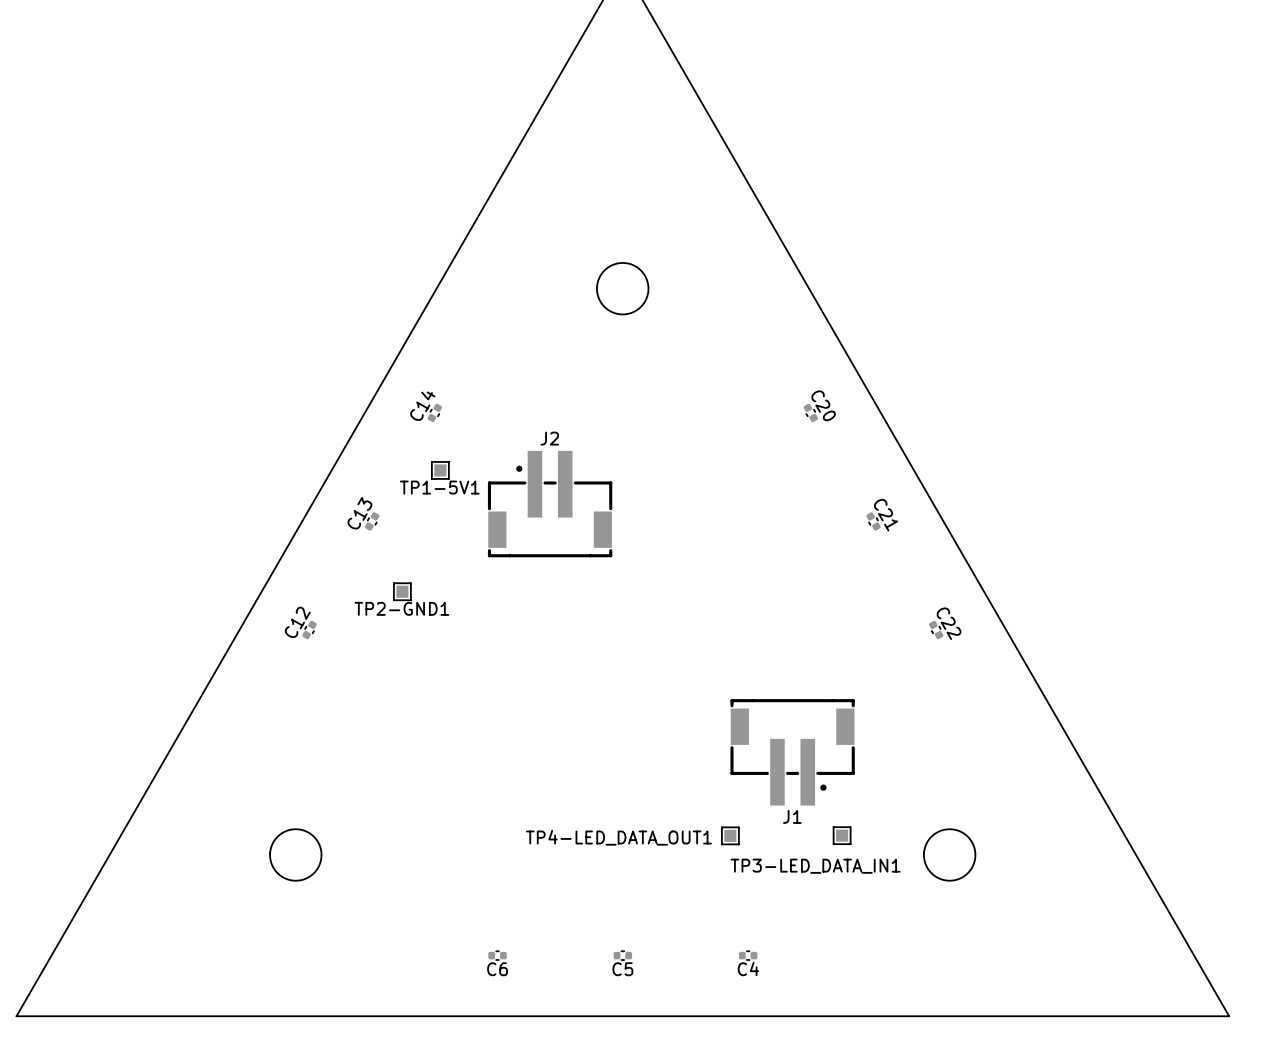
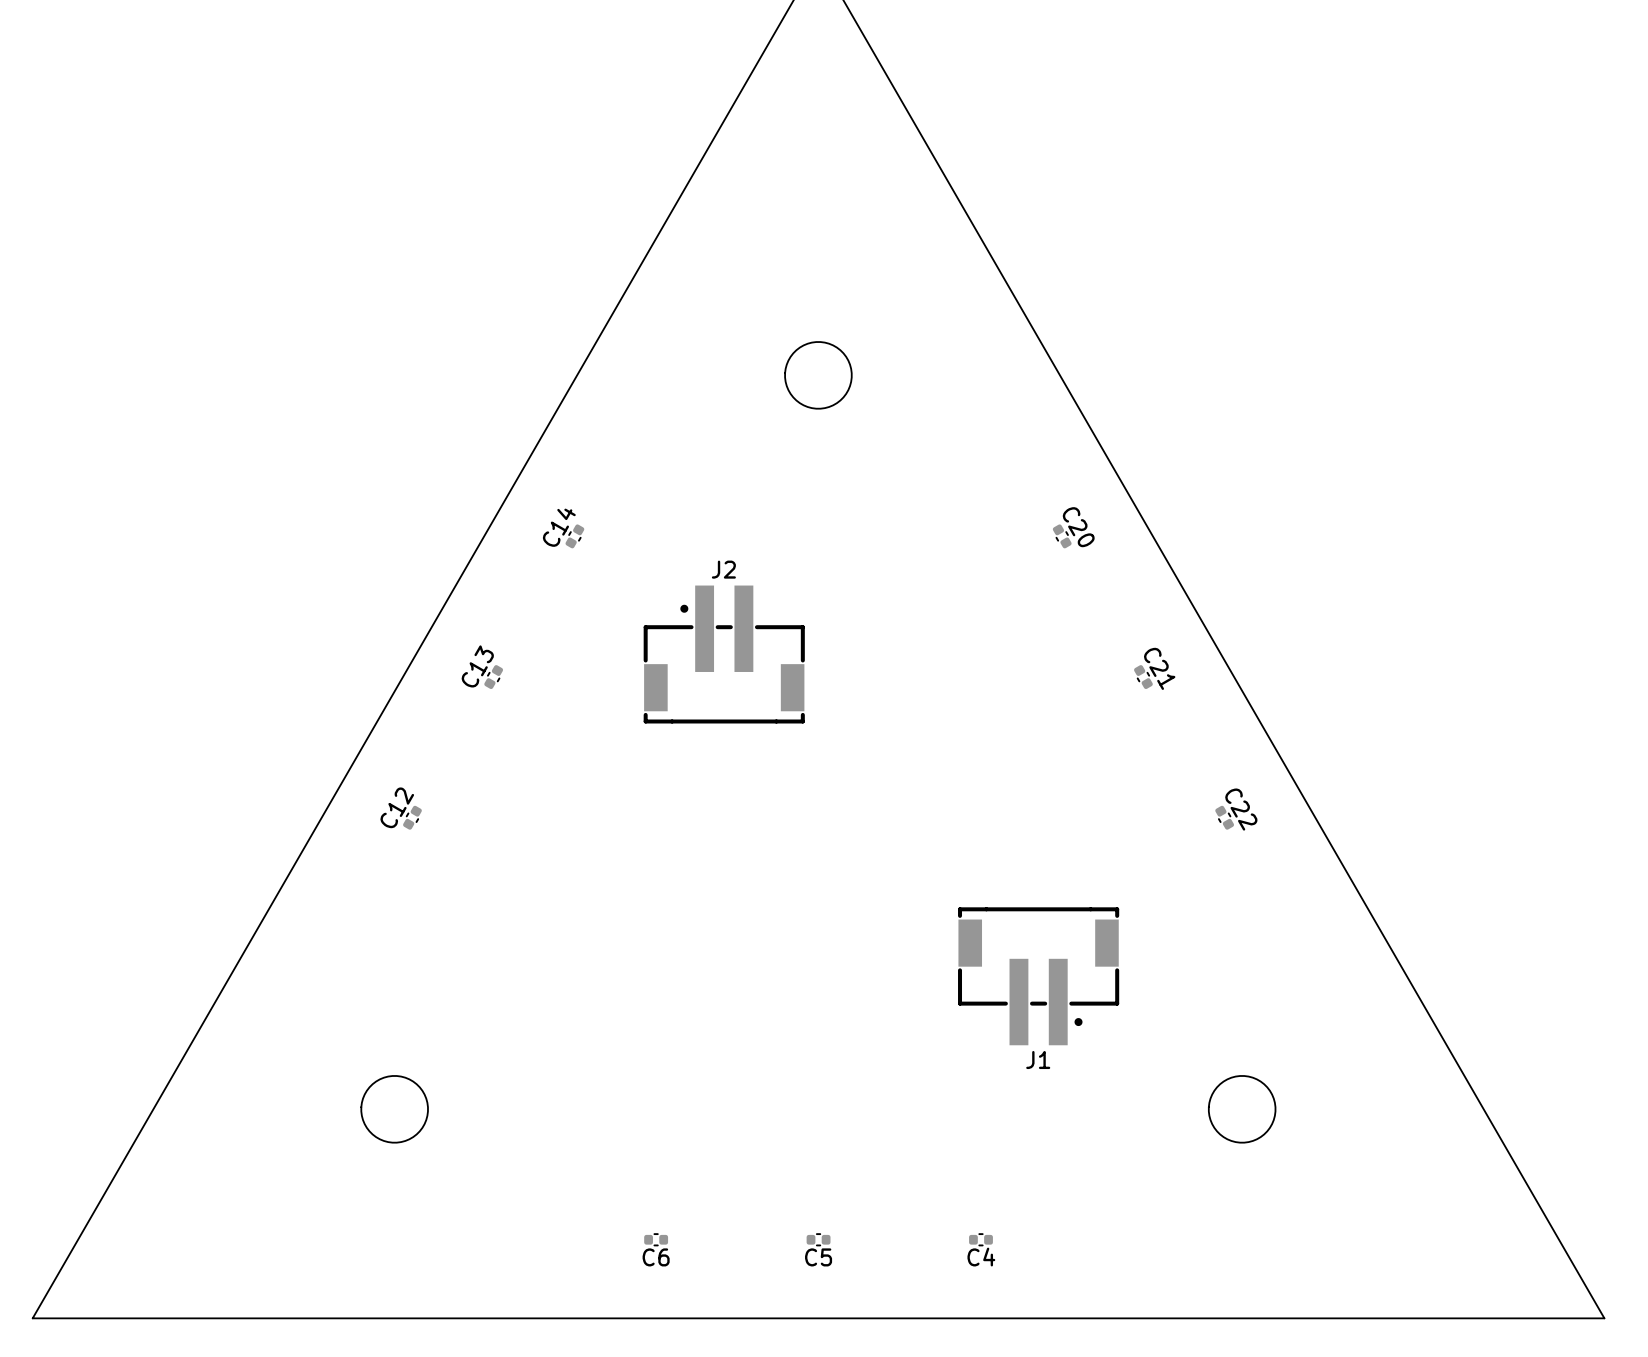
TP1-5V1: (440, 470) -> none
TP2-GND1: (402, 591) -> none
TP4-LED_DATA_OUT1: (730, 835) -> none
TP3-LED_DATA_IN1: (842, 835) -> none

